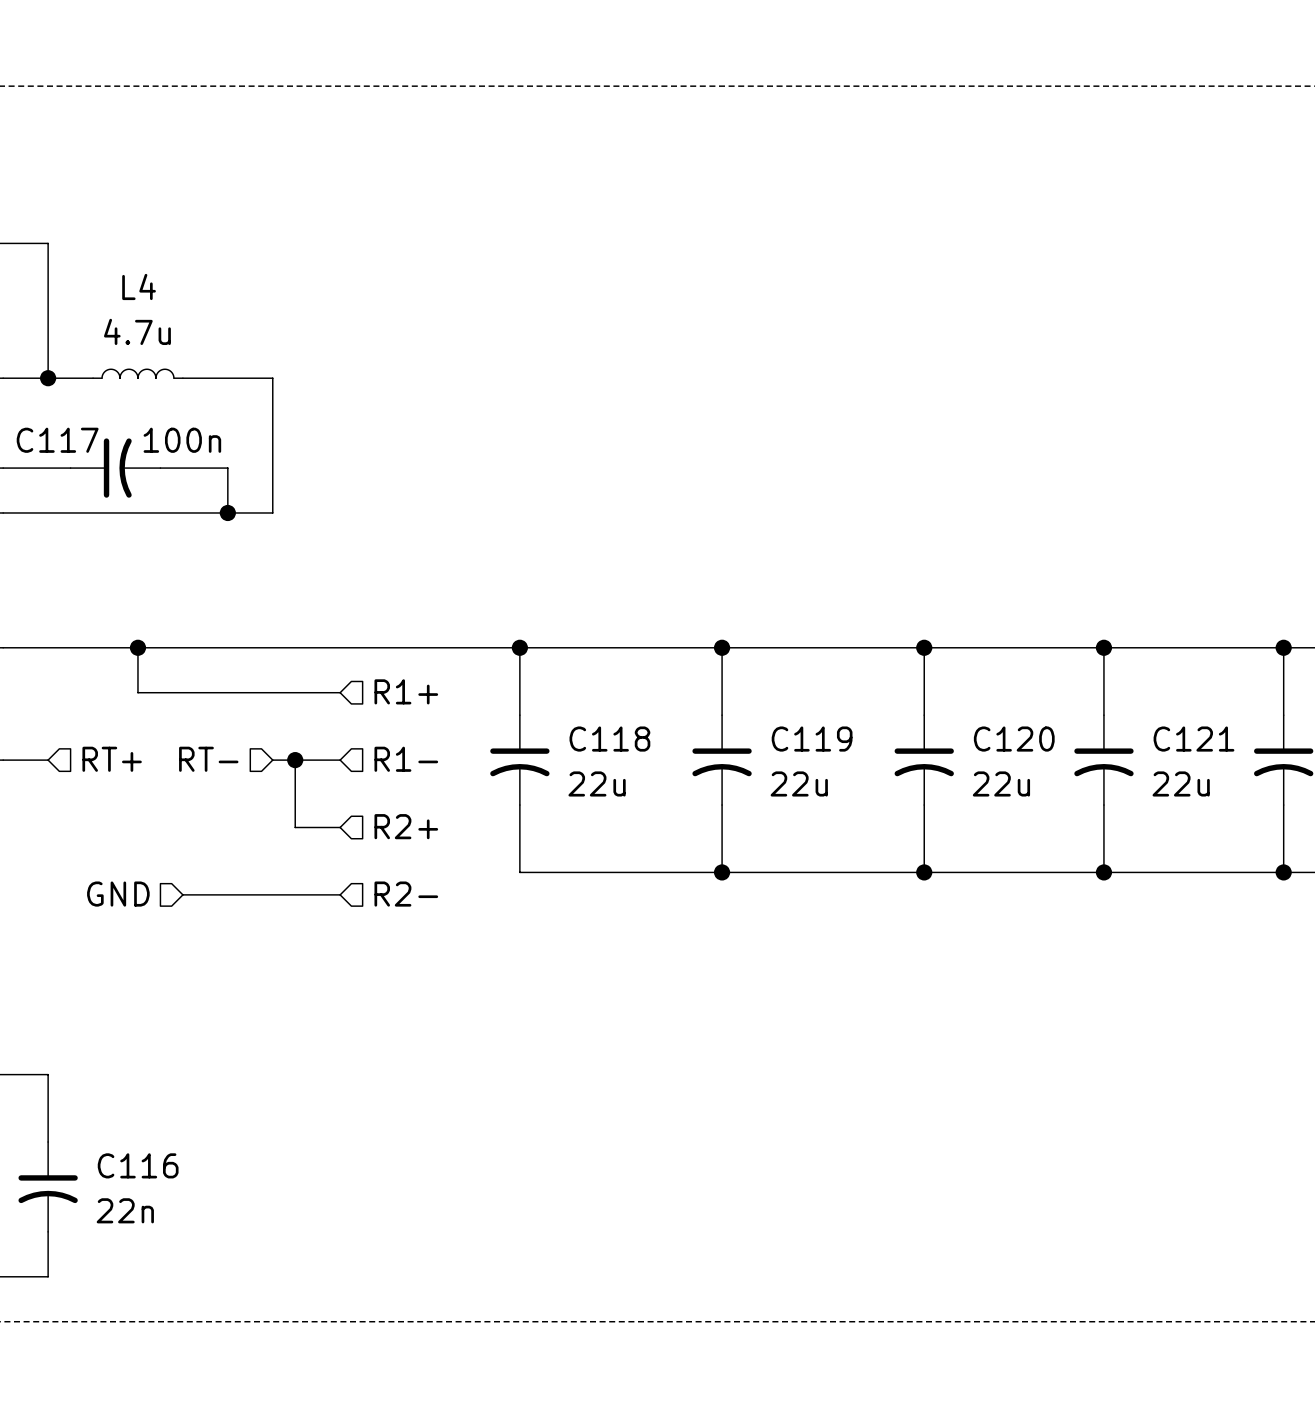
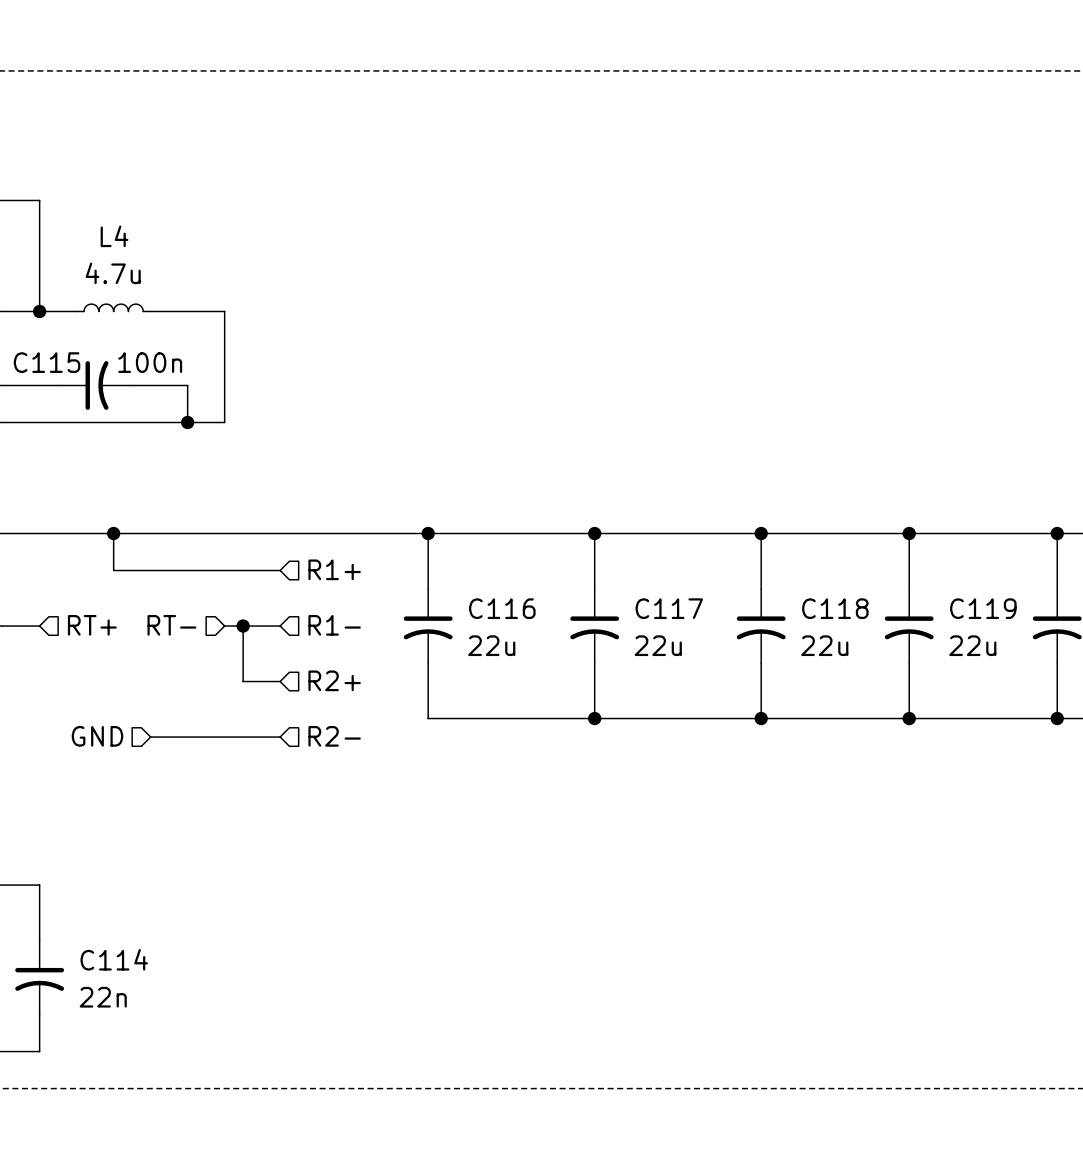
C117 name: C117 (57, 440) -> C115 (47, 362)
C118 name: C118 (609, 739) -> C116 (502, 608)
C119 name: C119 (812, 739) -> C117 (669, 608)
C120 name: C120 (1014, 739) -> C118 (835, 608)
C121 name: C121 (1193, 739) -> C119 (983, 608)
C116 name: C116 (138, 1165) -> C114 (114, 959)

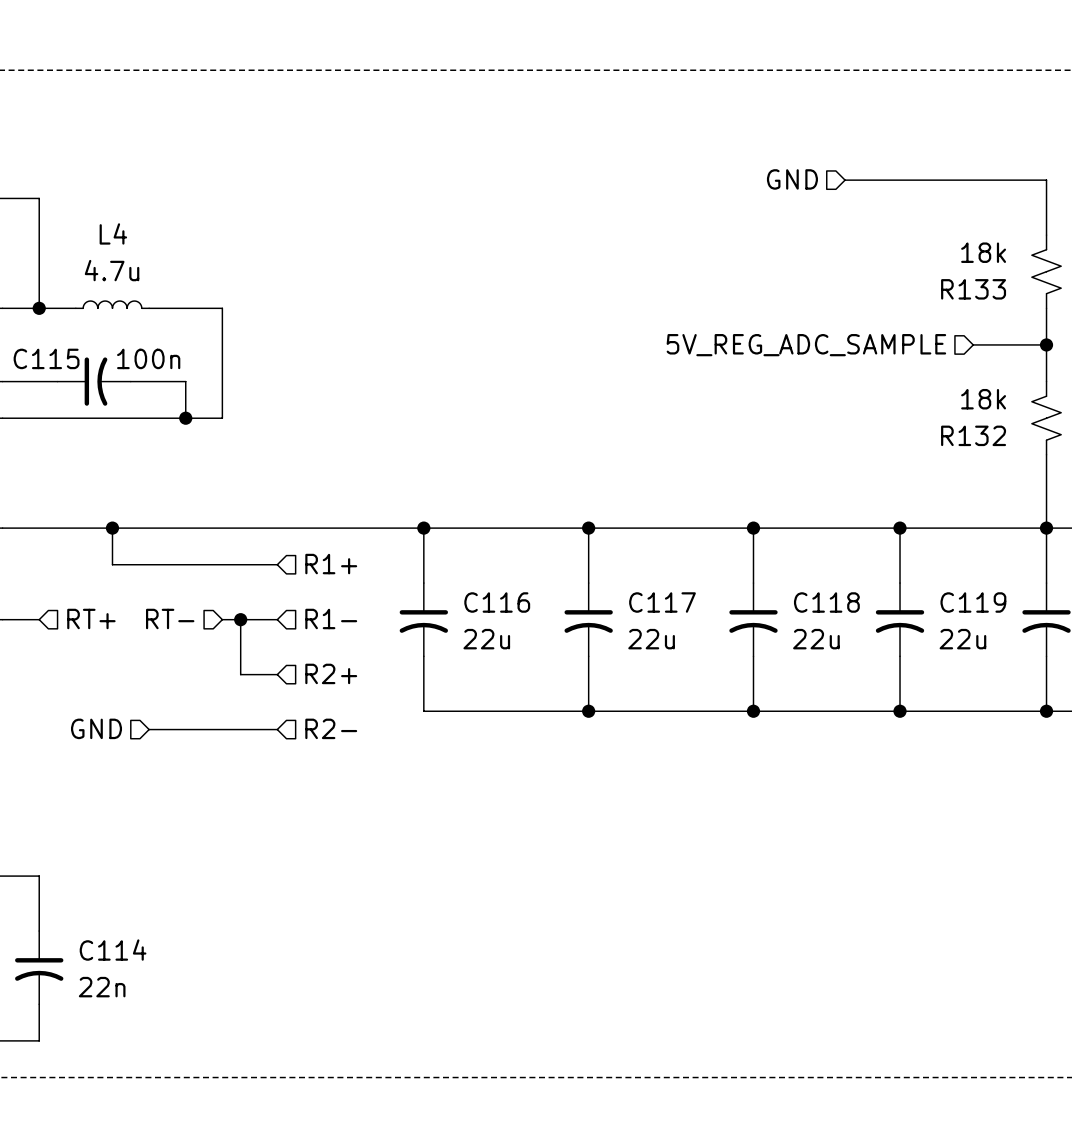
hierarchical label: none -> GND (792, 179)
wire: none -> (845, 180) (1046, 180) (1046, 235)
R133: none -> 18k (1046, 271)
wire: none -> (1046, 308) (1046, 381)
hierarchical label: none -> 5V_REG_ADC_SAMPLE (806, 345)
wire: none -> (973, 344) (1046, 344)
junction: none -> (1046, 344)
R132: none -> 18k (1046, 418)
wire: none -> (1046, 454) (1046, 528)

